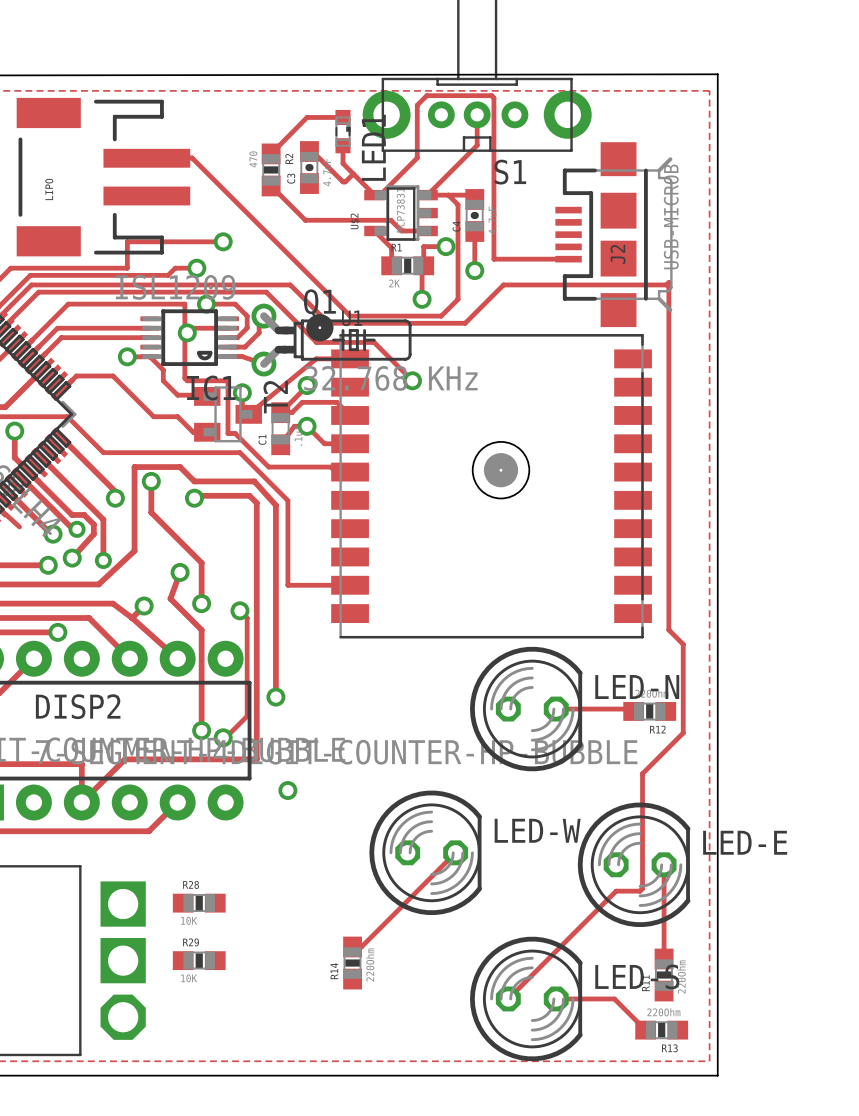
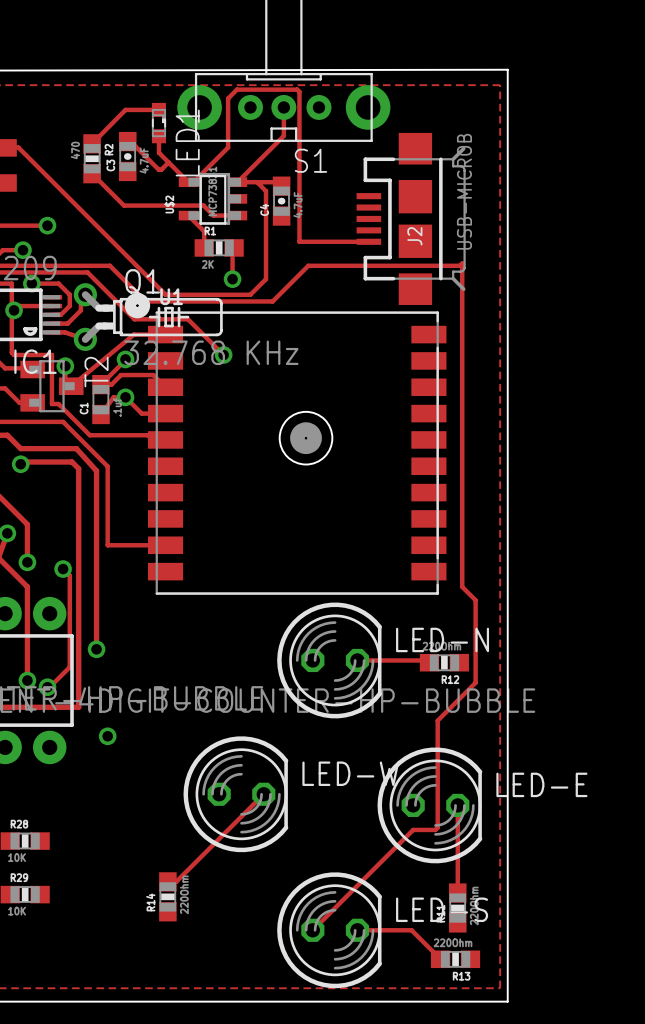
track: (474, 231) (474, 270) -> none
track: (446, 246) (423, 246) (423, 265) -> none
via: (446, 246) -> none
via: (474, 270) -> none

